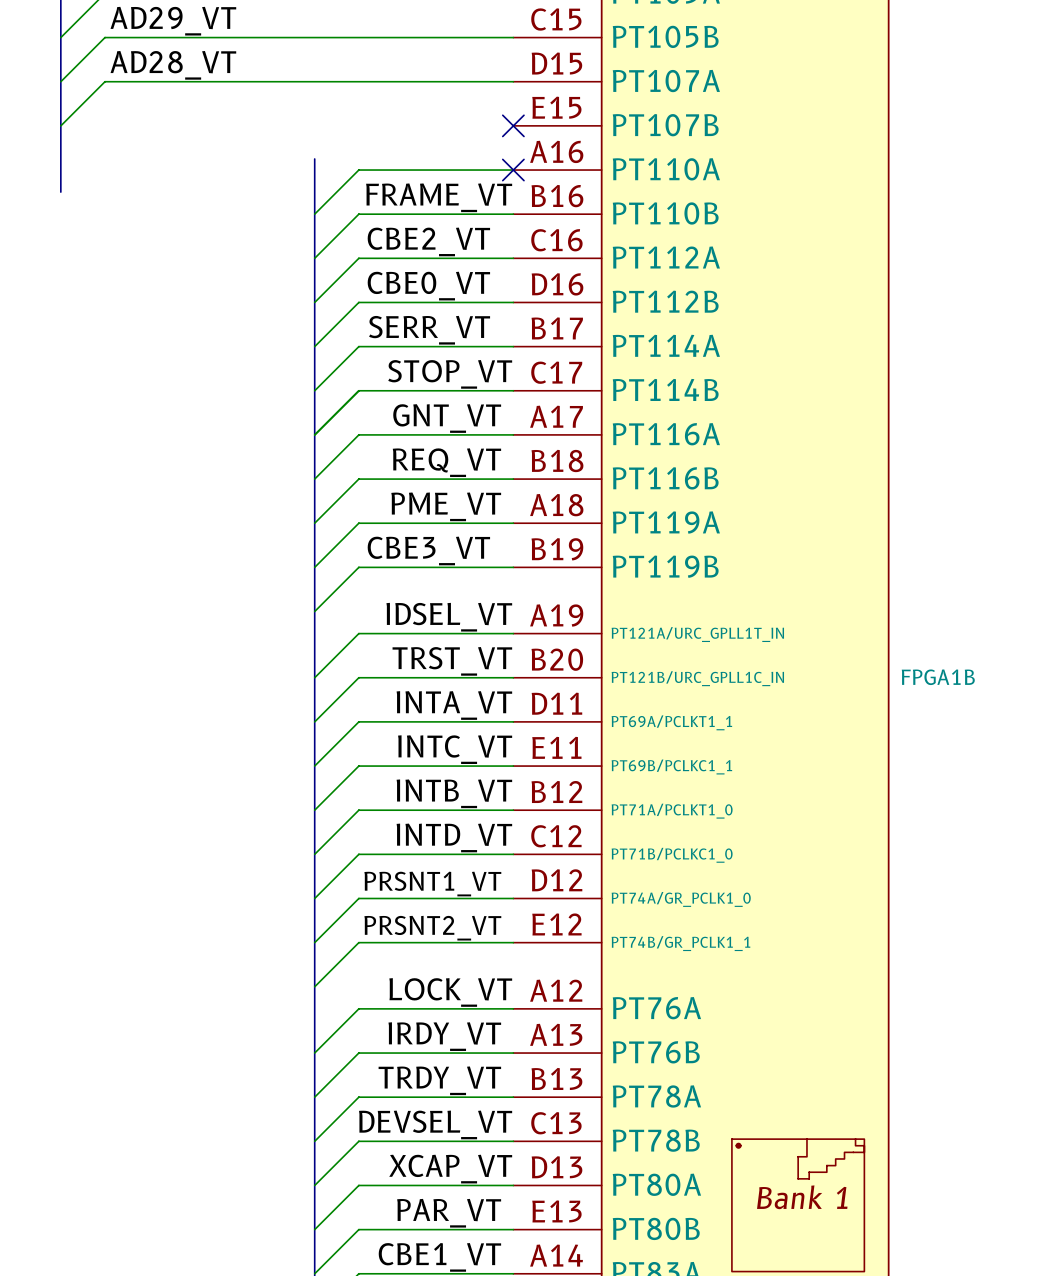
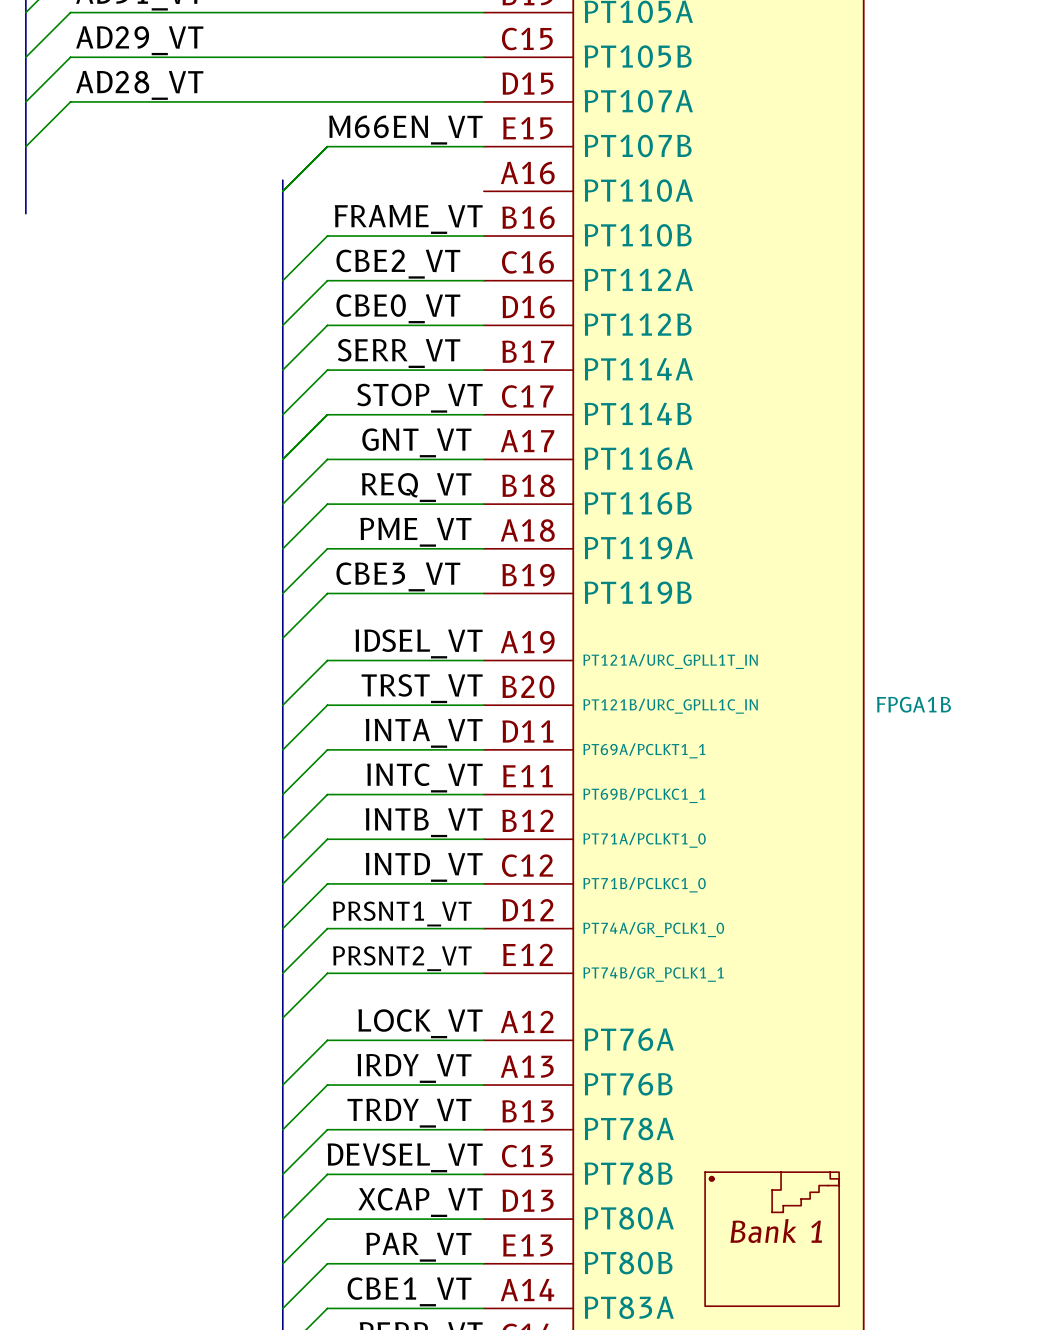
label: none -> M66EN_VT (405, 130)
no-connect mark: (513, 125) -> none
wire: (513, 170) (358, 170) (314, 214) -> (483, 146) (327, 146) (282, 191)
no-connect mark: (513, 170) -> none

